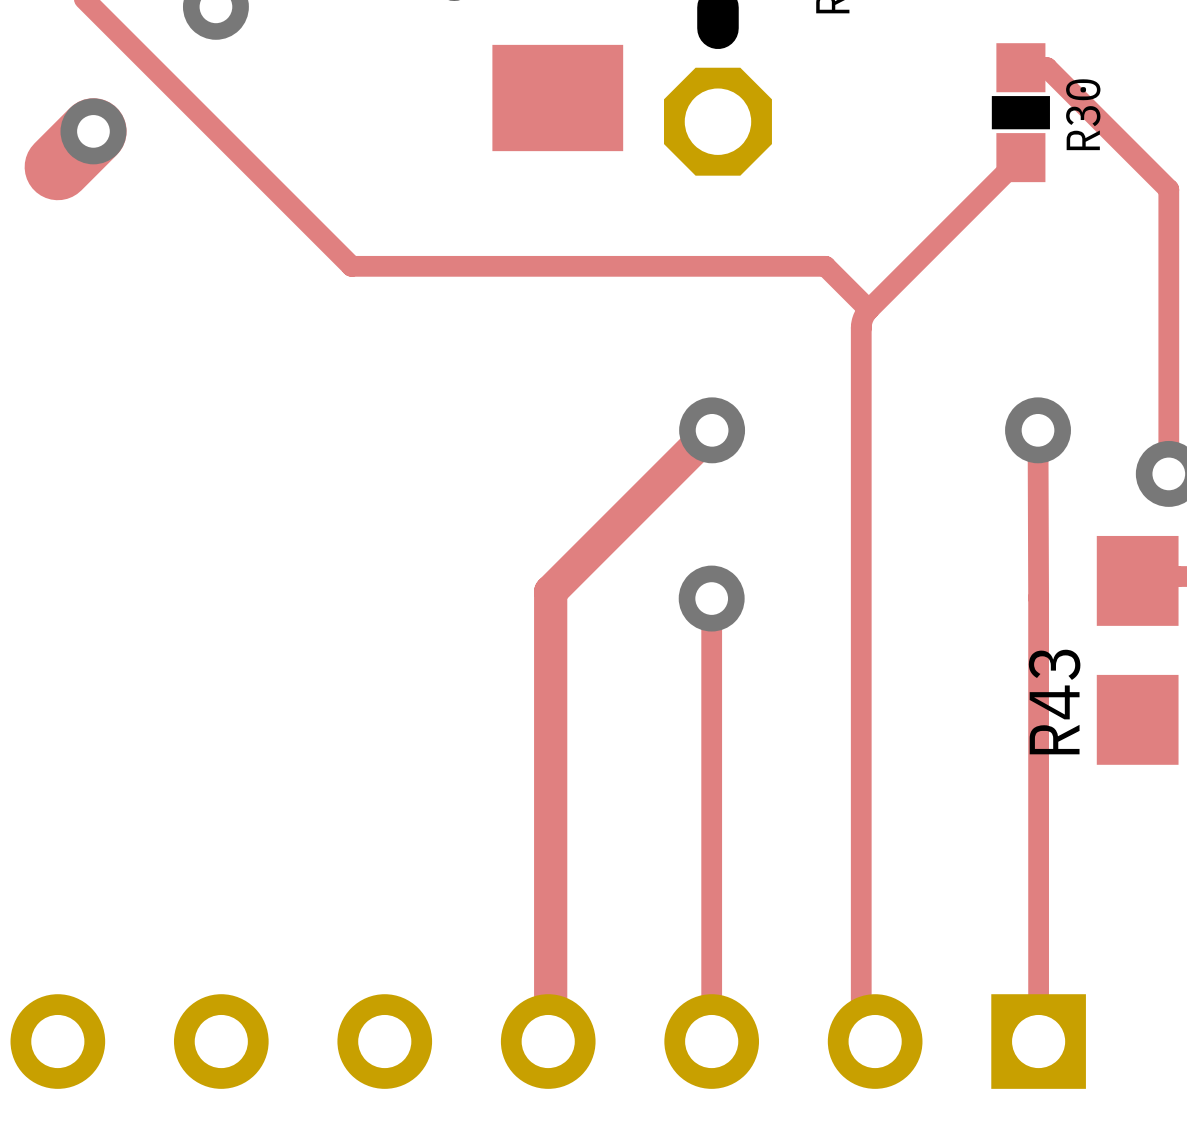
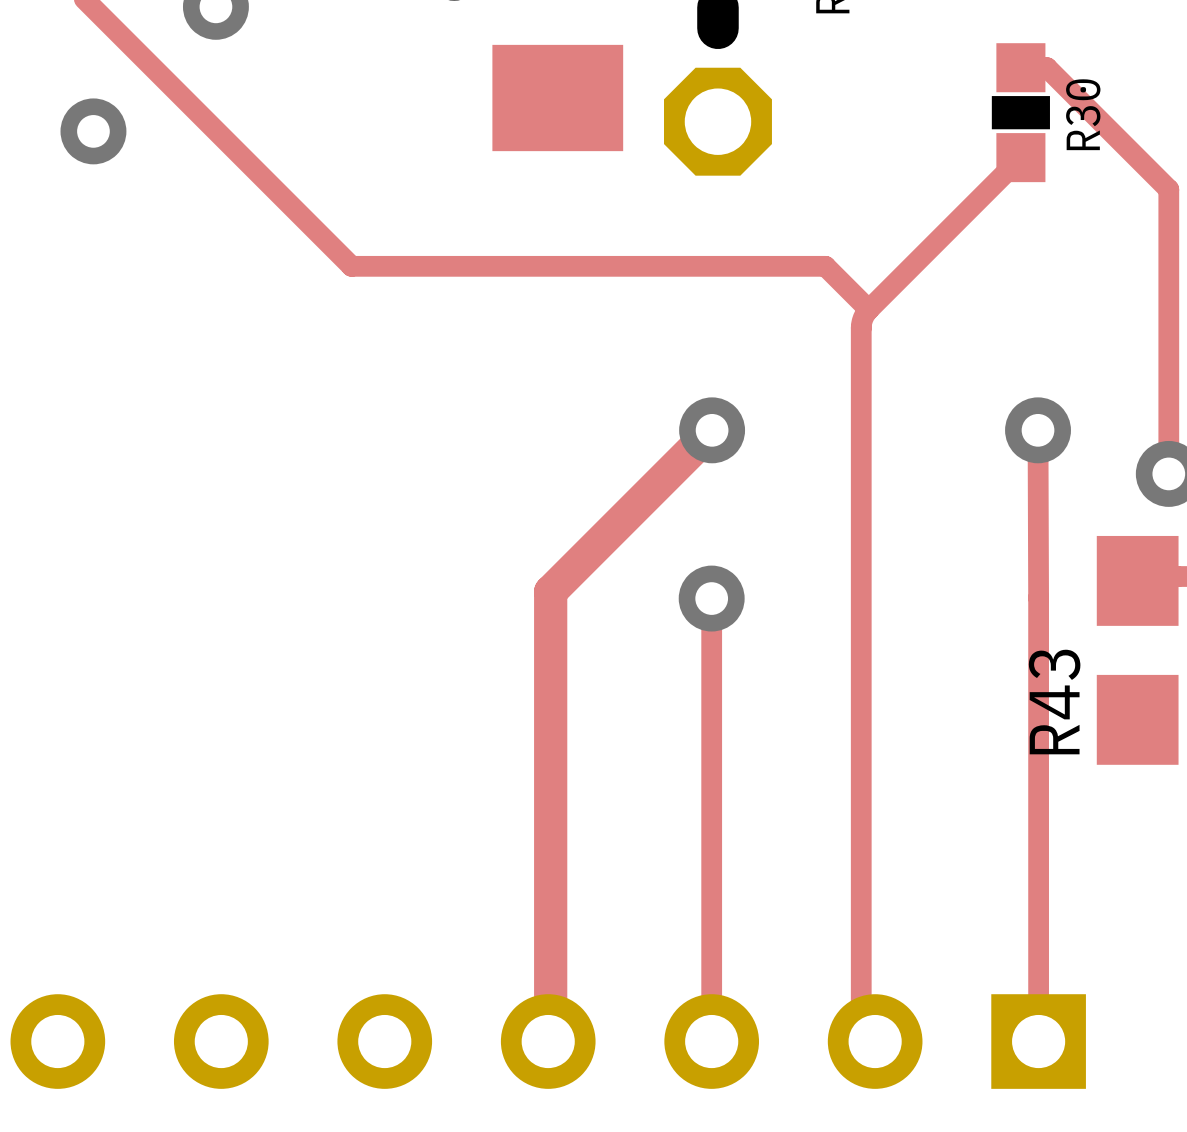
track: (93, 131) (57, 167) -> none

